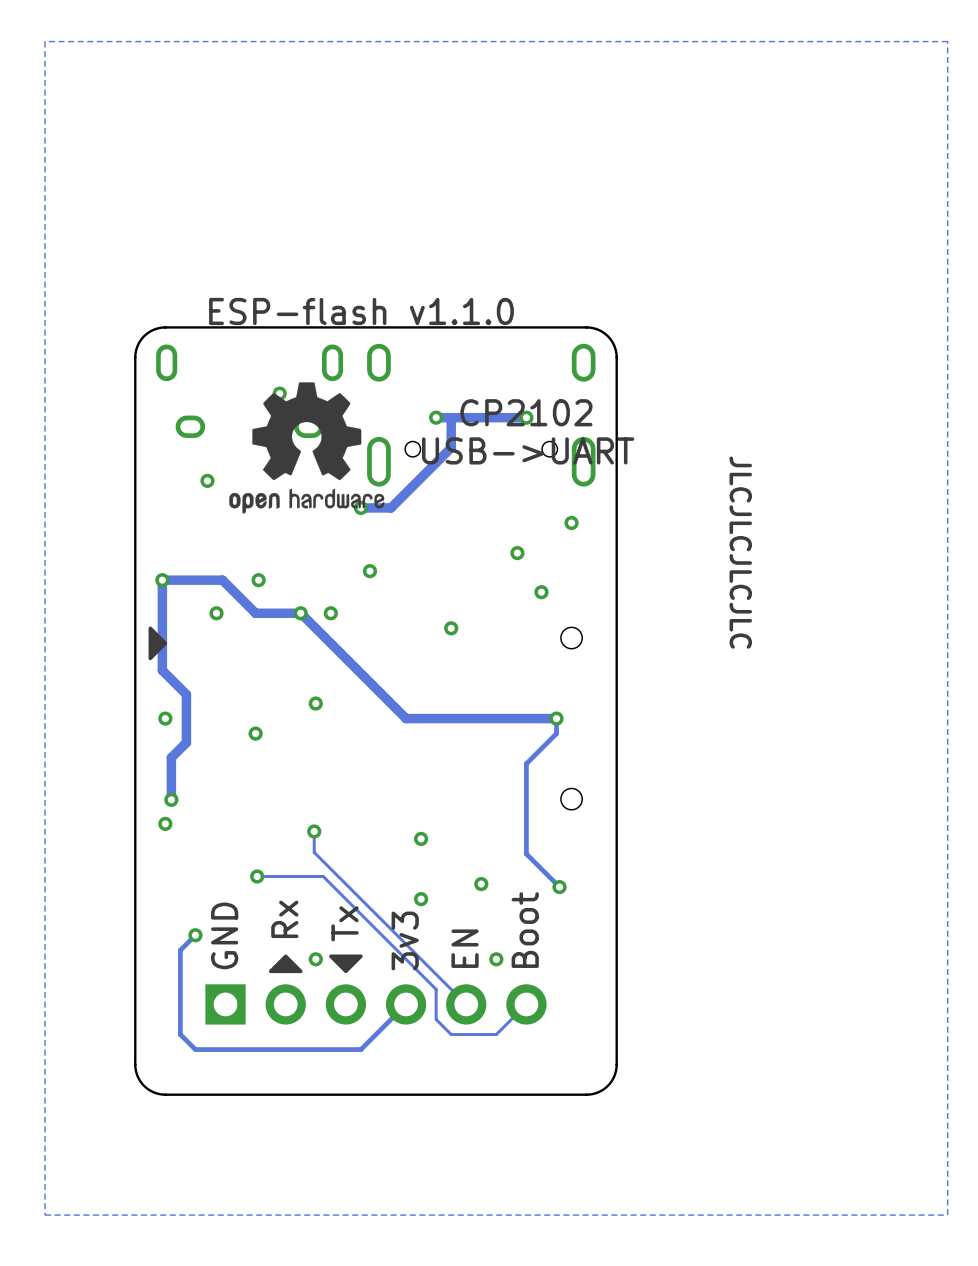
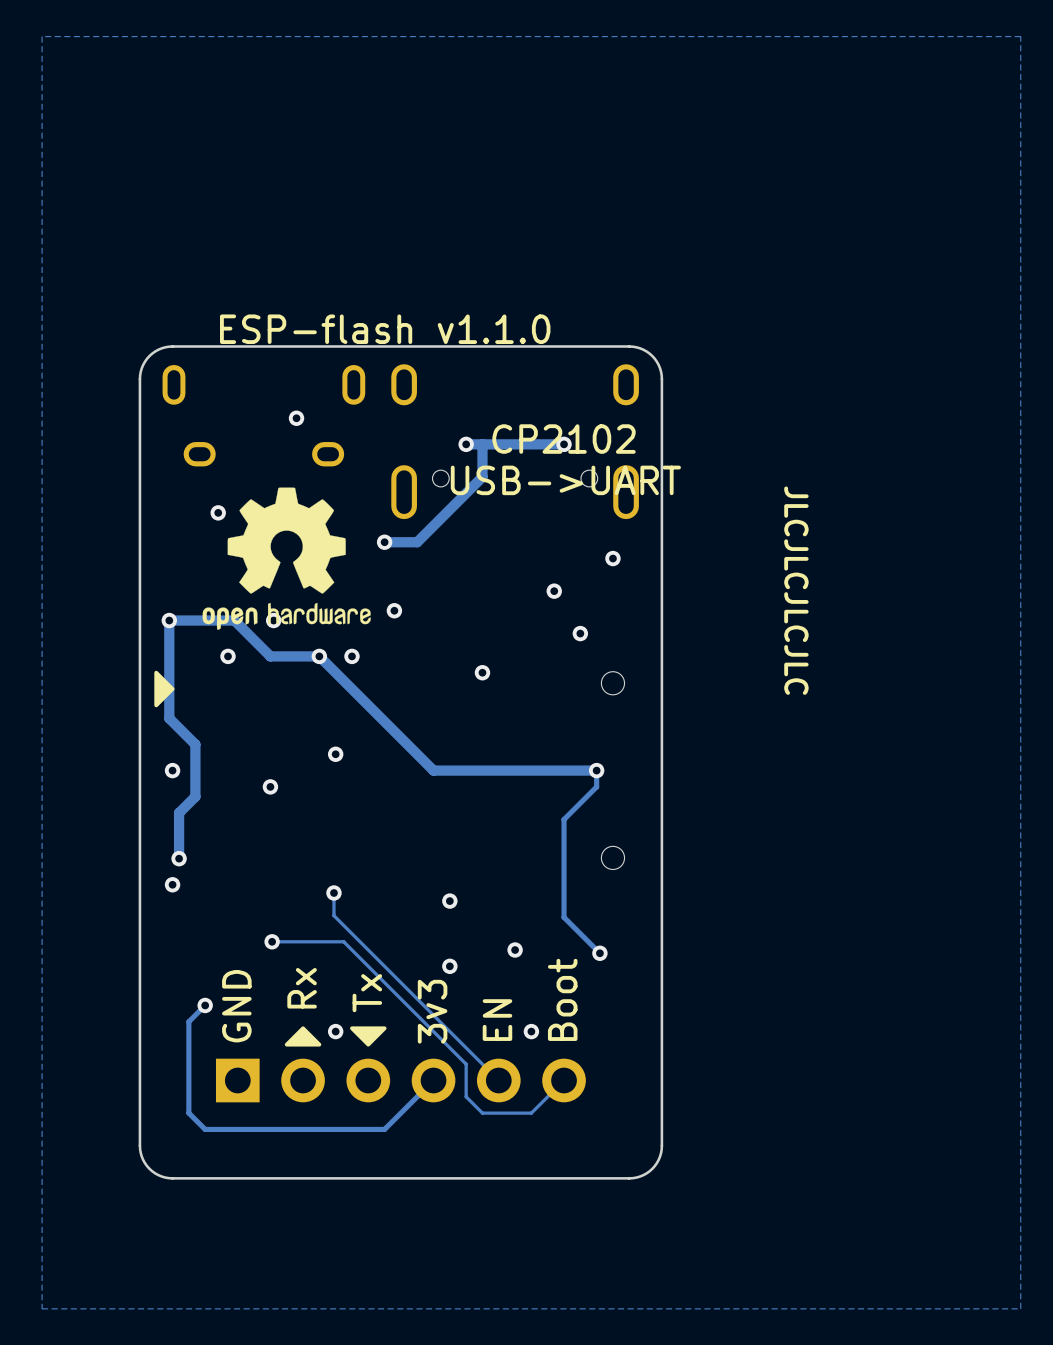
drawing position: (306, 447) -> (286, 558)

